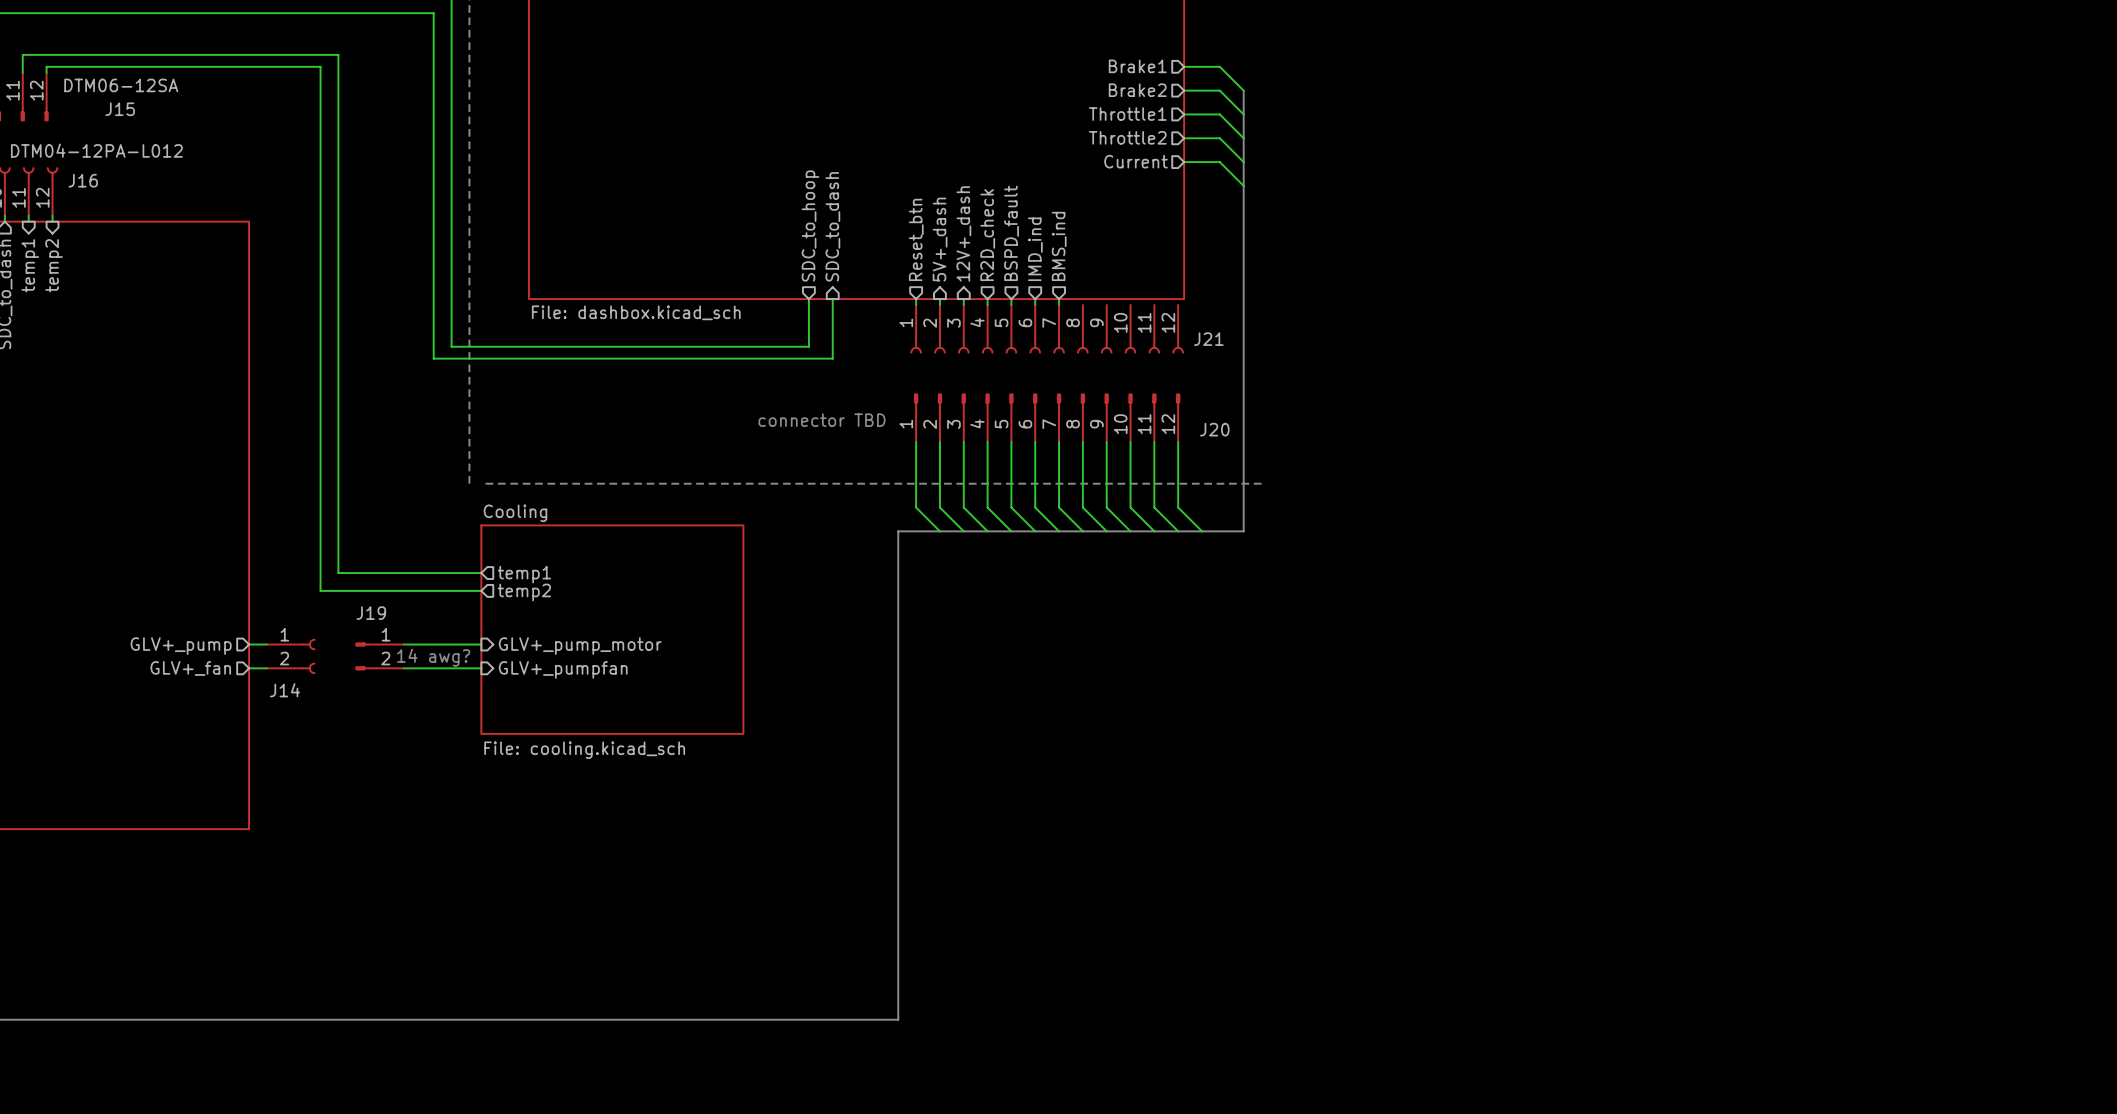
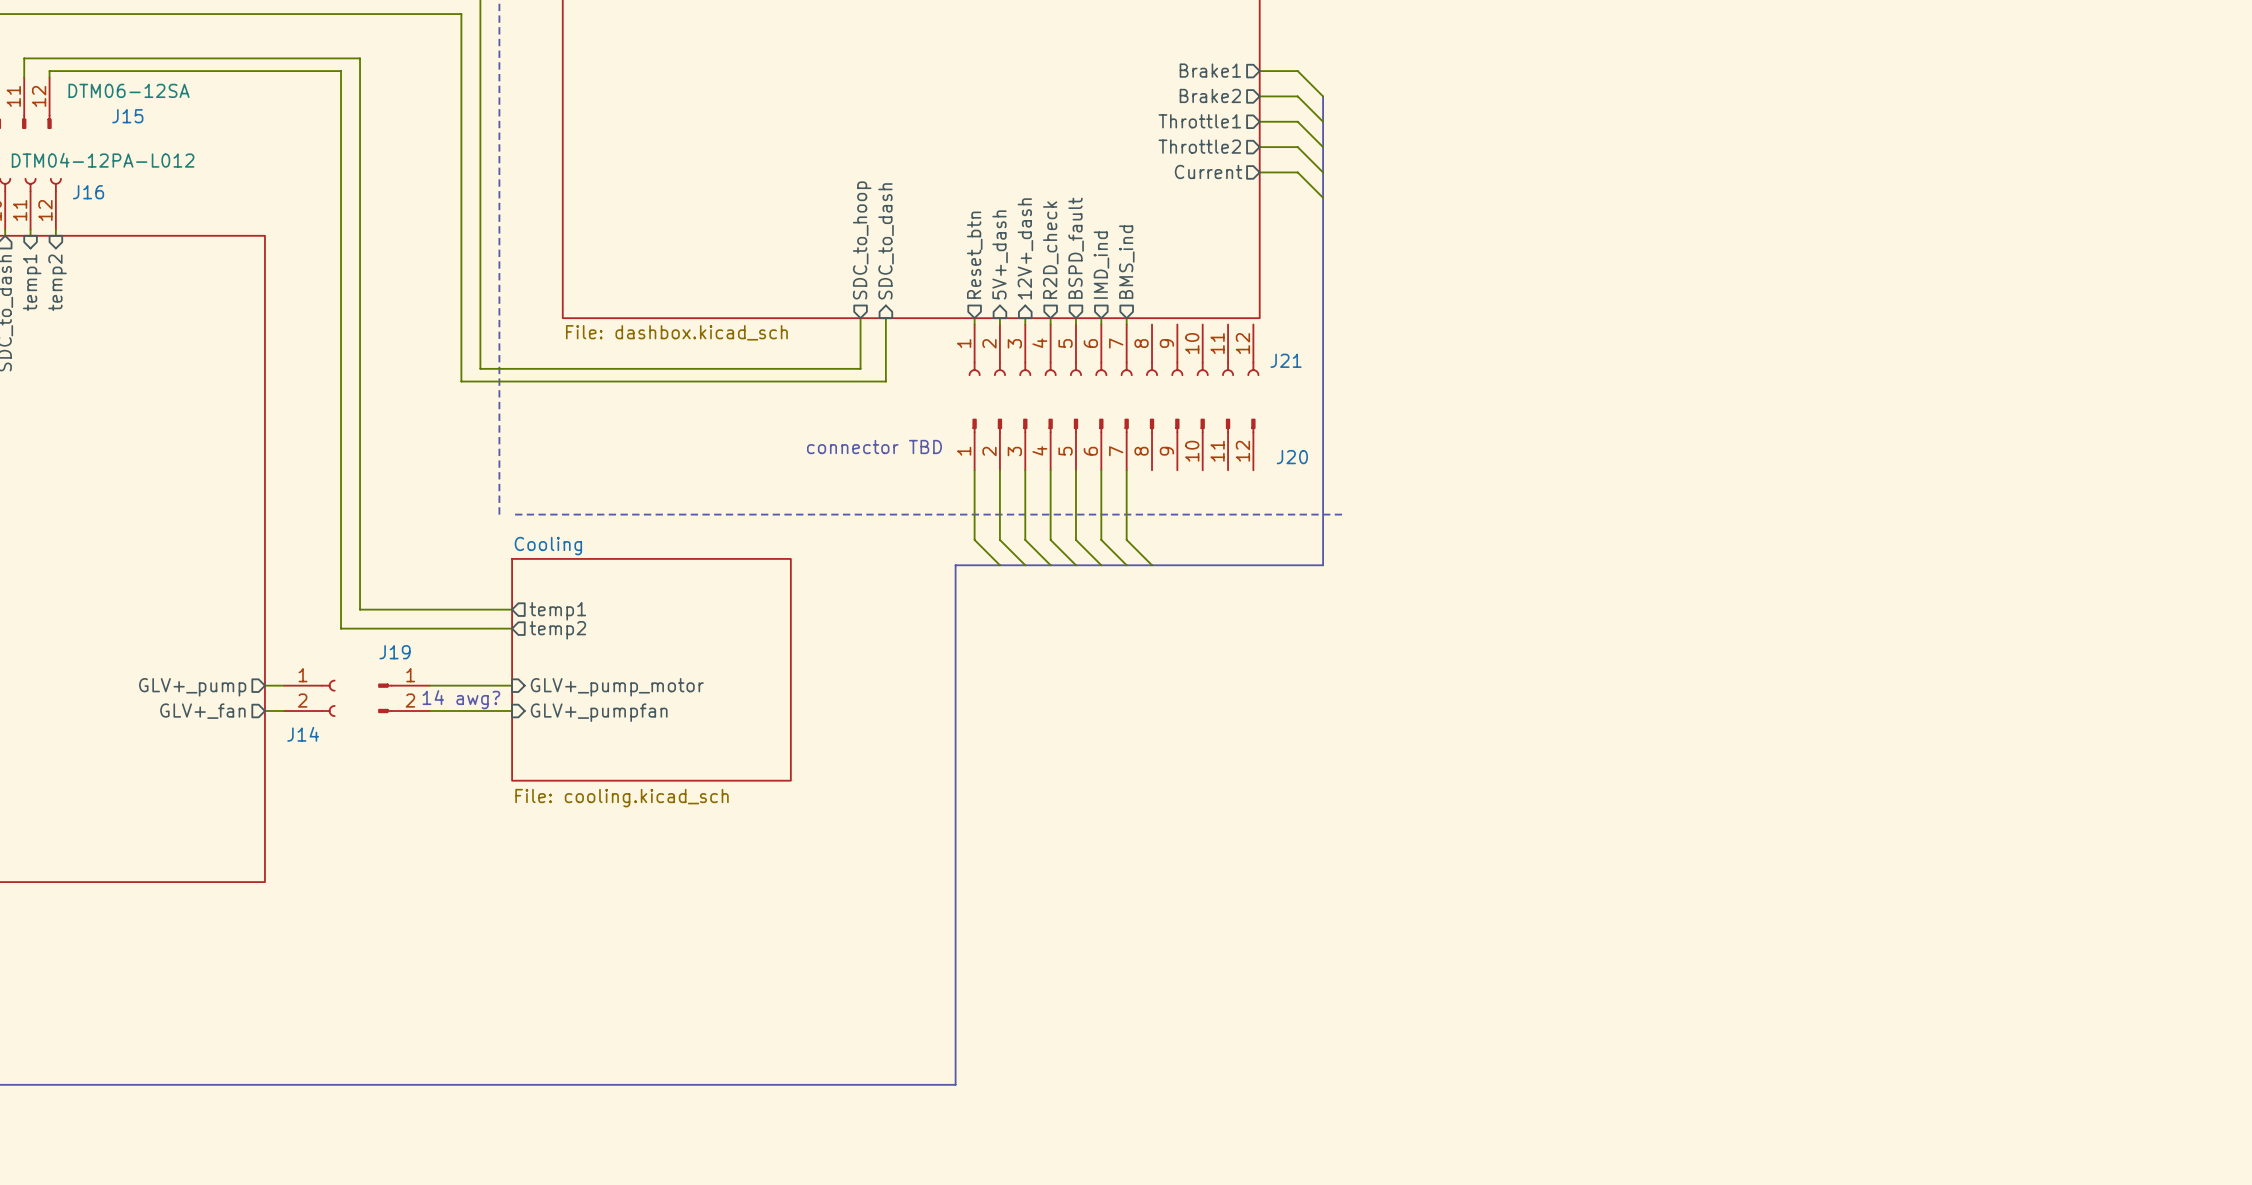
wire: (1082, 442) (1082, 507) (1106, 531) -> none
wire: (1106, 442) (1106, 507) (1130, 531) -> none
wire: (1130, 442) (1130, 507) (1154, 531) -> none
wire: (1154, 442) (1154, 507) (1178, 531) -> none
wire: (1178, 442) (1178, 507) (1201, 531) -> none

